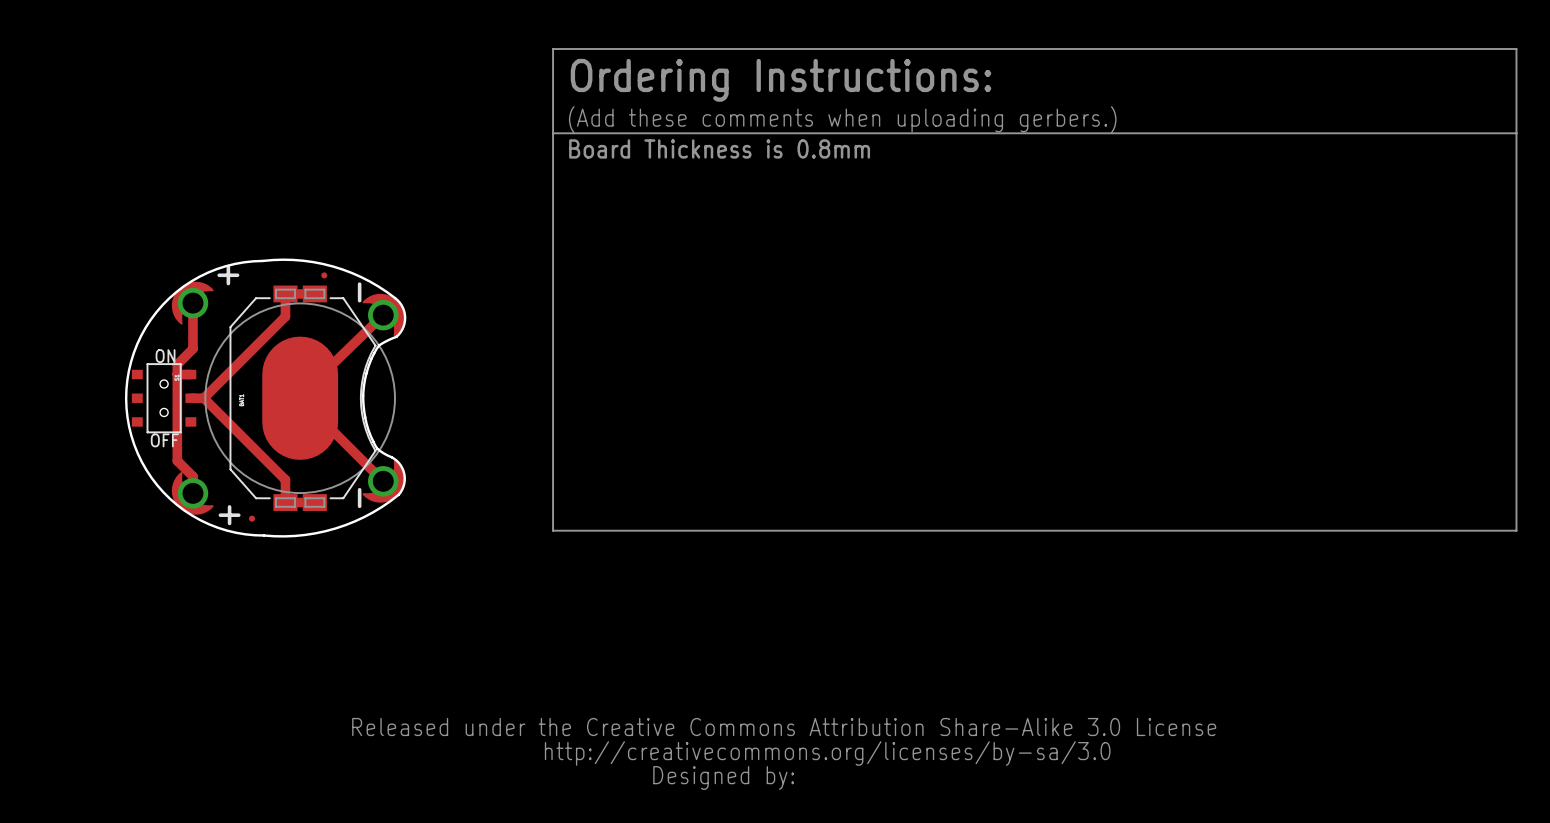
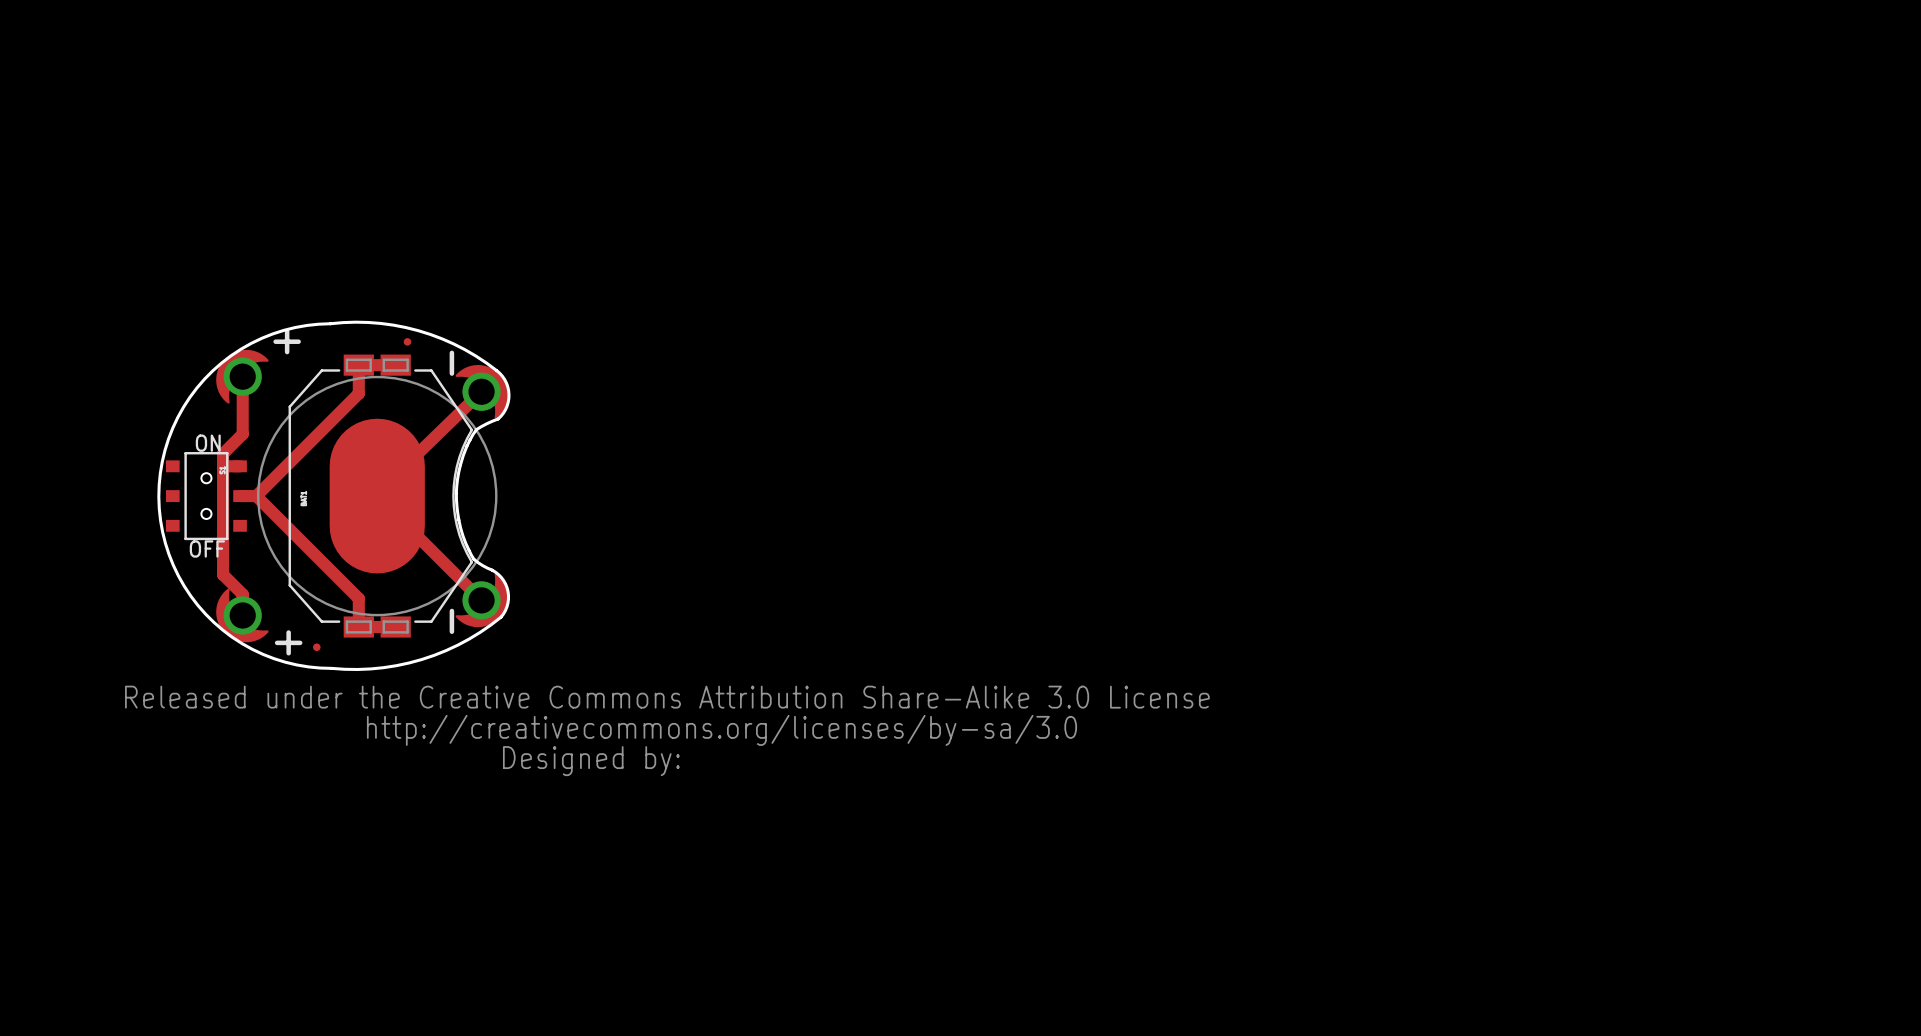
drawing: [552, 48, 1518, 532] -> none
text: Board Thickness is 0.8mm (719, 148) -> none
drawing: none -> [125, 685, 1210, 777]
drawing: [352, 717, 1217, 790] -> none

